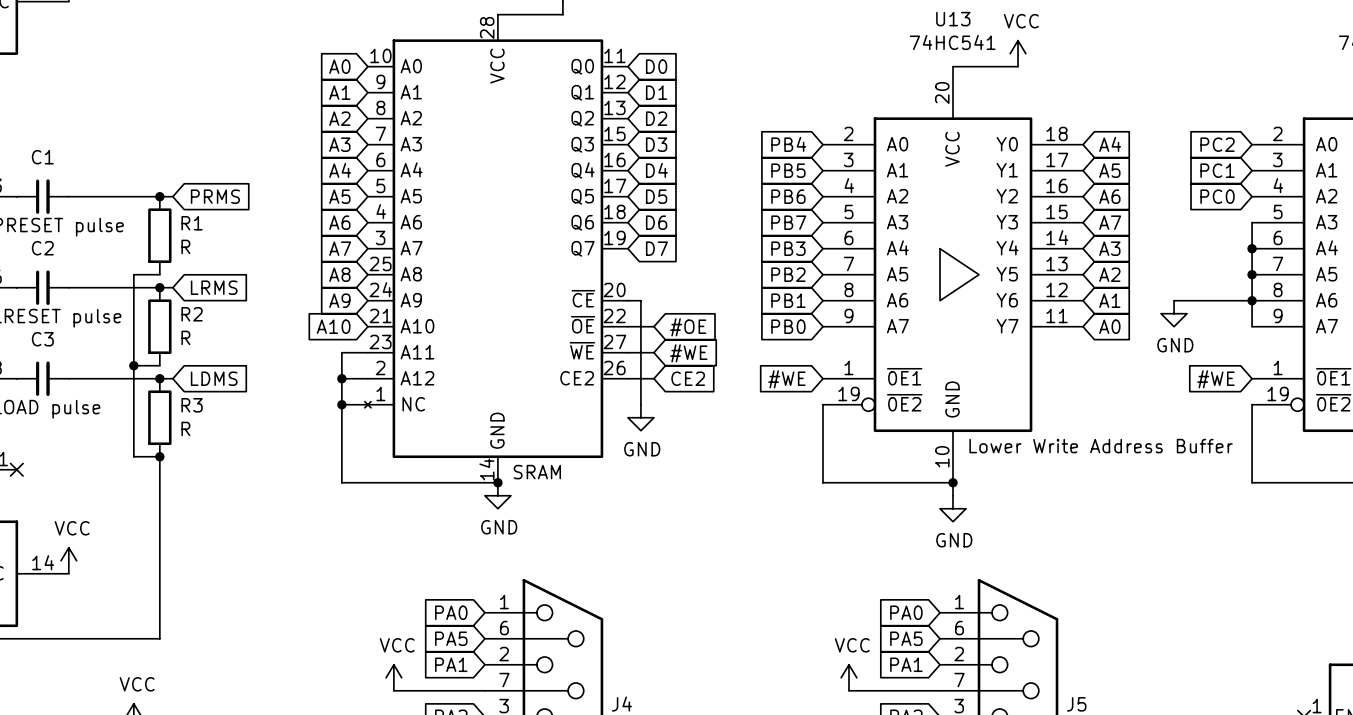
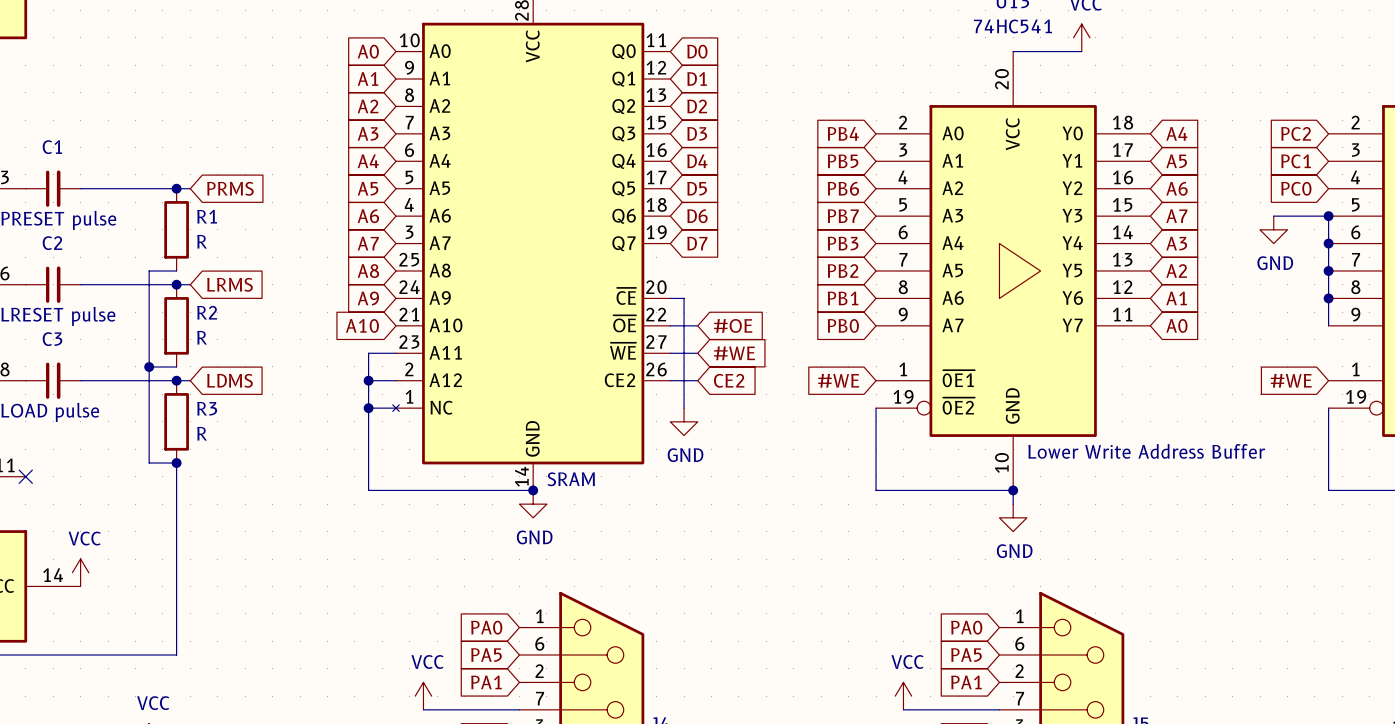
wire: none -> (1273, 216) (1328, 216)
junction: none -> (1328, 216)
wire: (1174, 300) (1252, 300) -> none
power symbol position: GND (1174, 313) -> GND (1273, 229)

